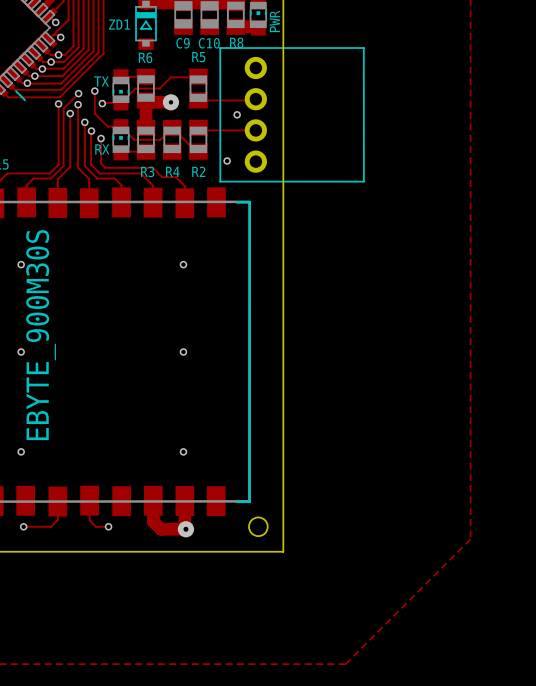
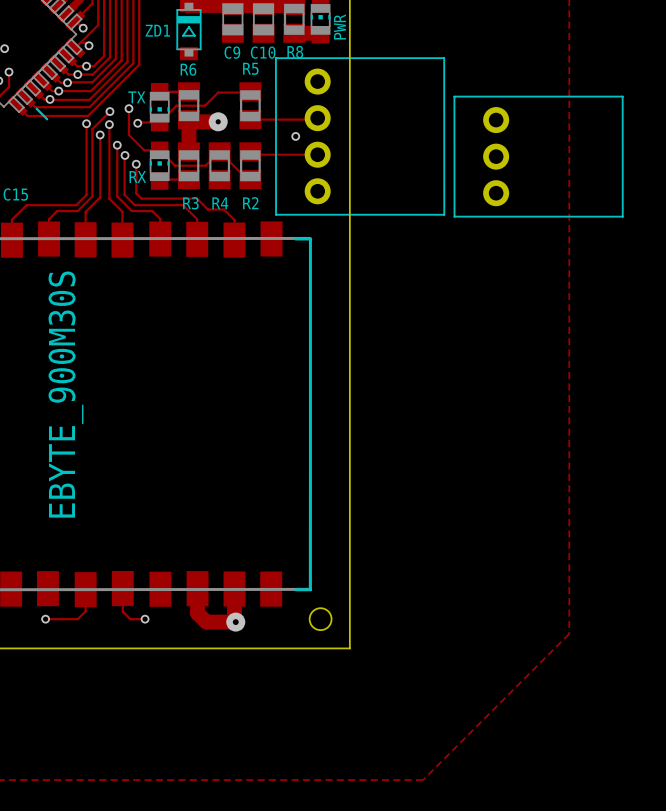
part: none -> (538, 156)
via: (227, 161) -> none
via: (21, 264) -> none
via: (183, 264) -> none
via: (21, 352) -> none
via: (183, 352) -> none
via: (21, 451) -> none
via: (183, 451) -> none

